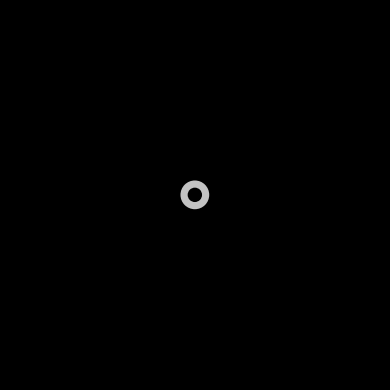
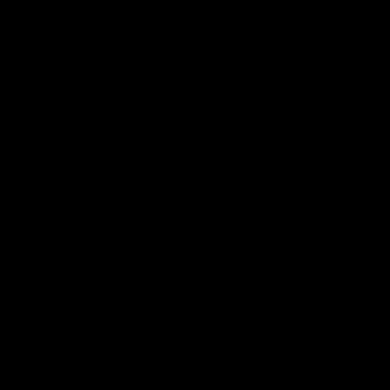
via: (194, 194) -> none

